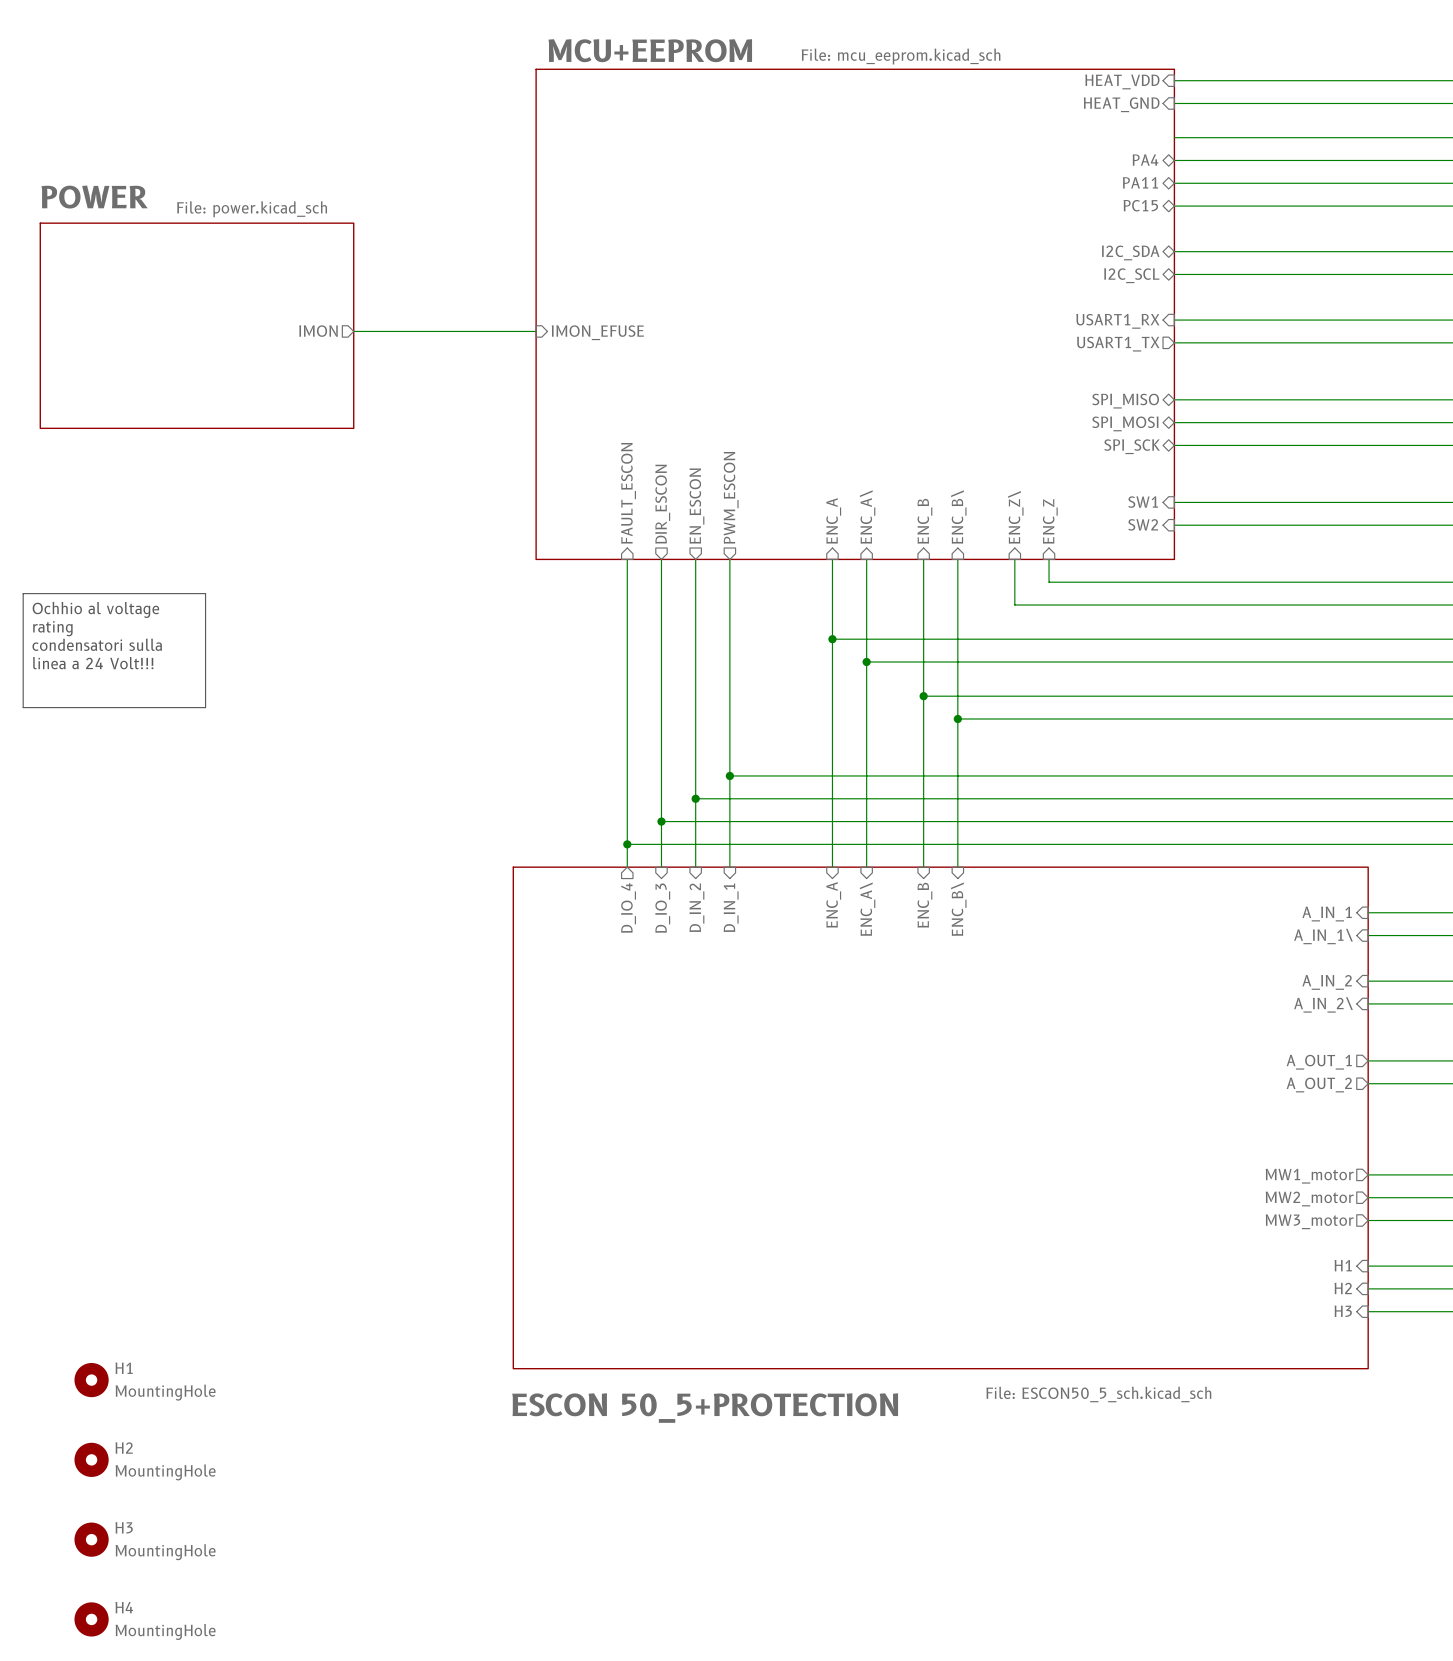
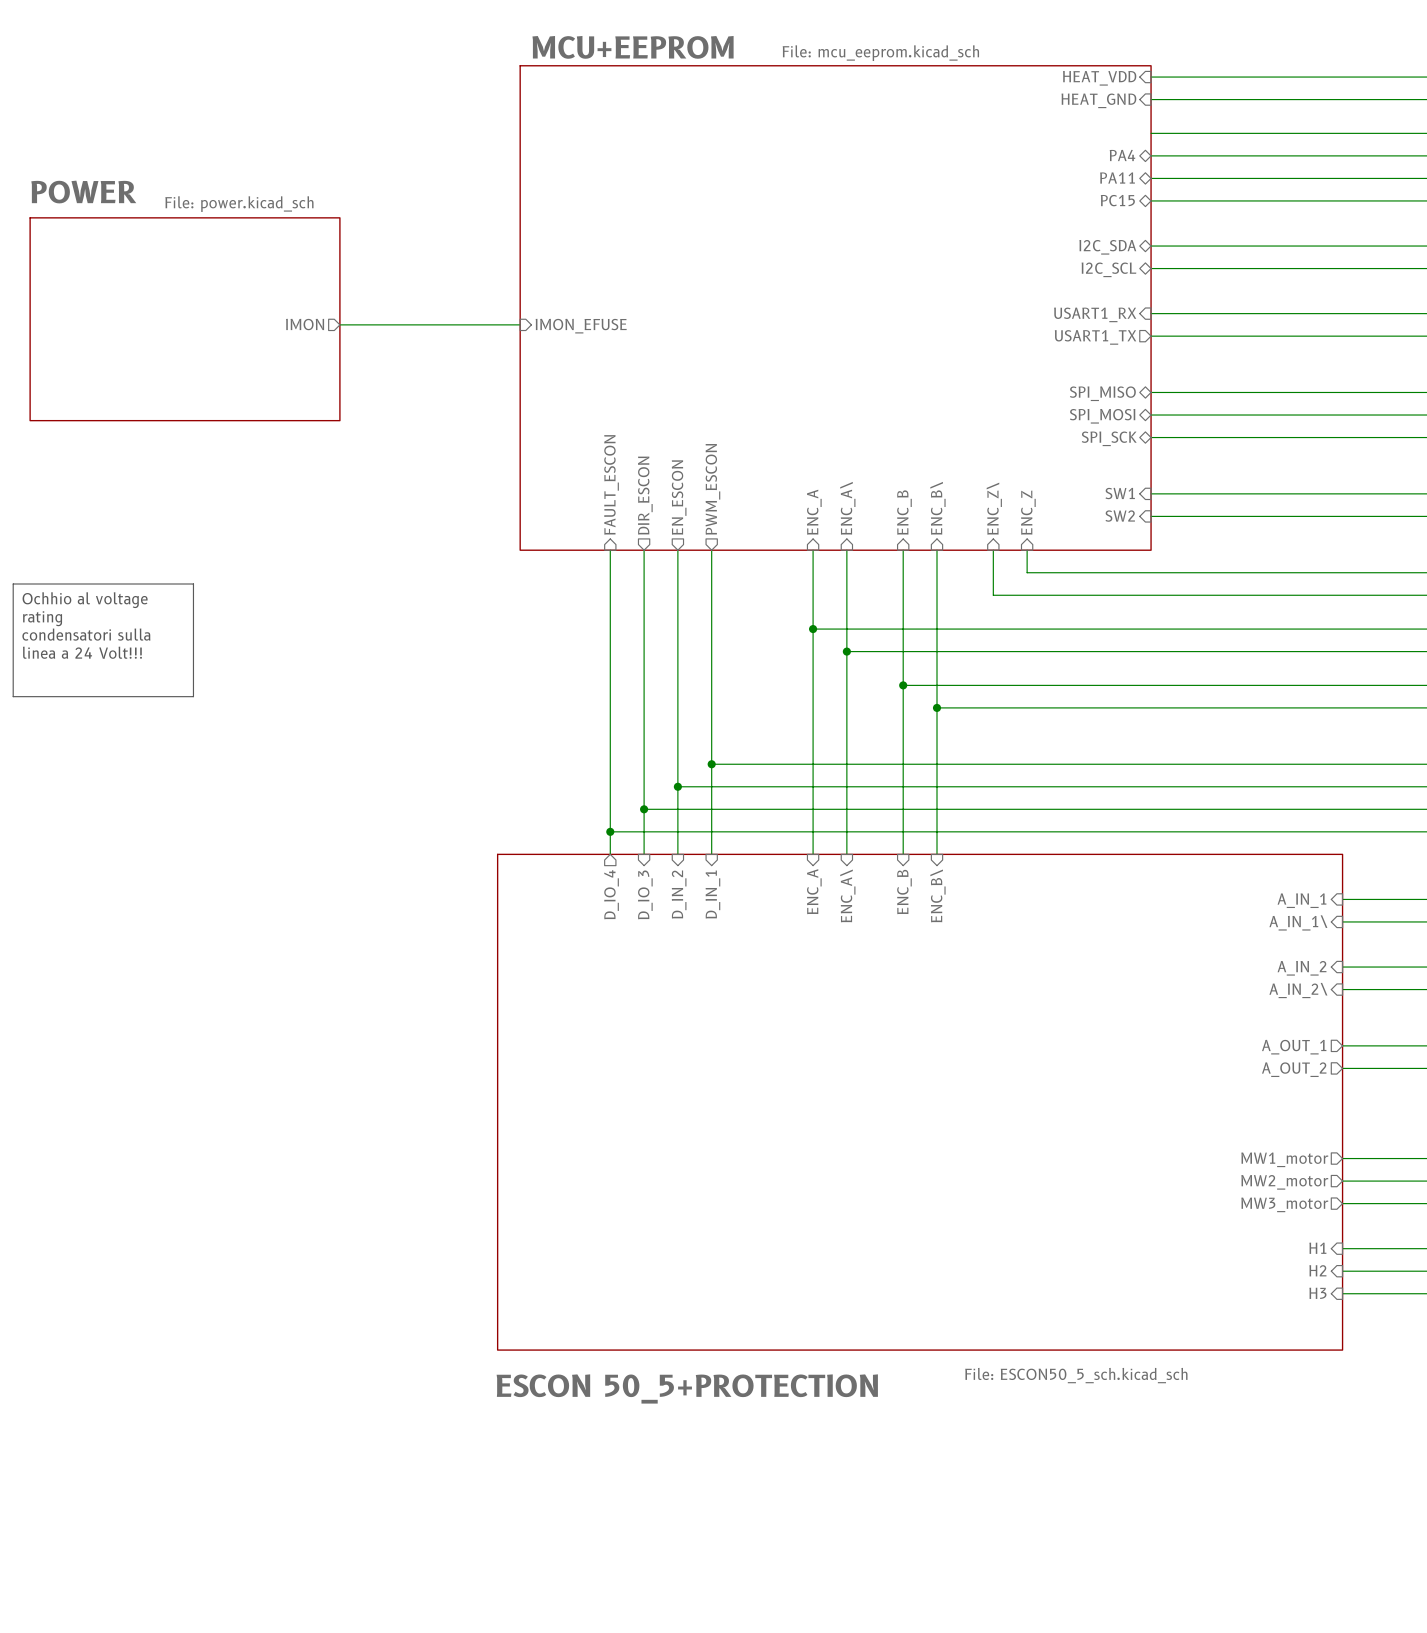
H1: MountingHole (91, 1380) -> none
H2: MountingHole (91, 1459) -> none
H3: MountingHole (91, 1539) -> none
H4: MountingHole (91, 1619) -> none

